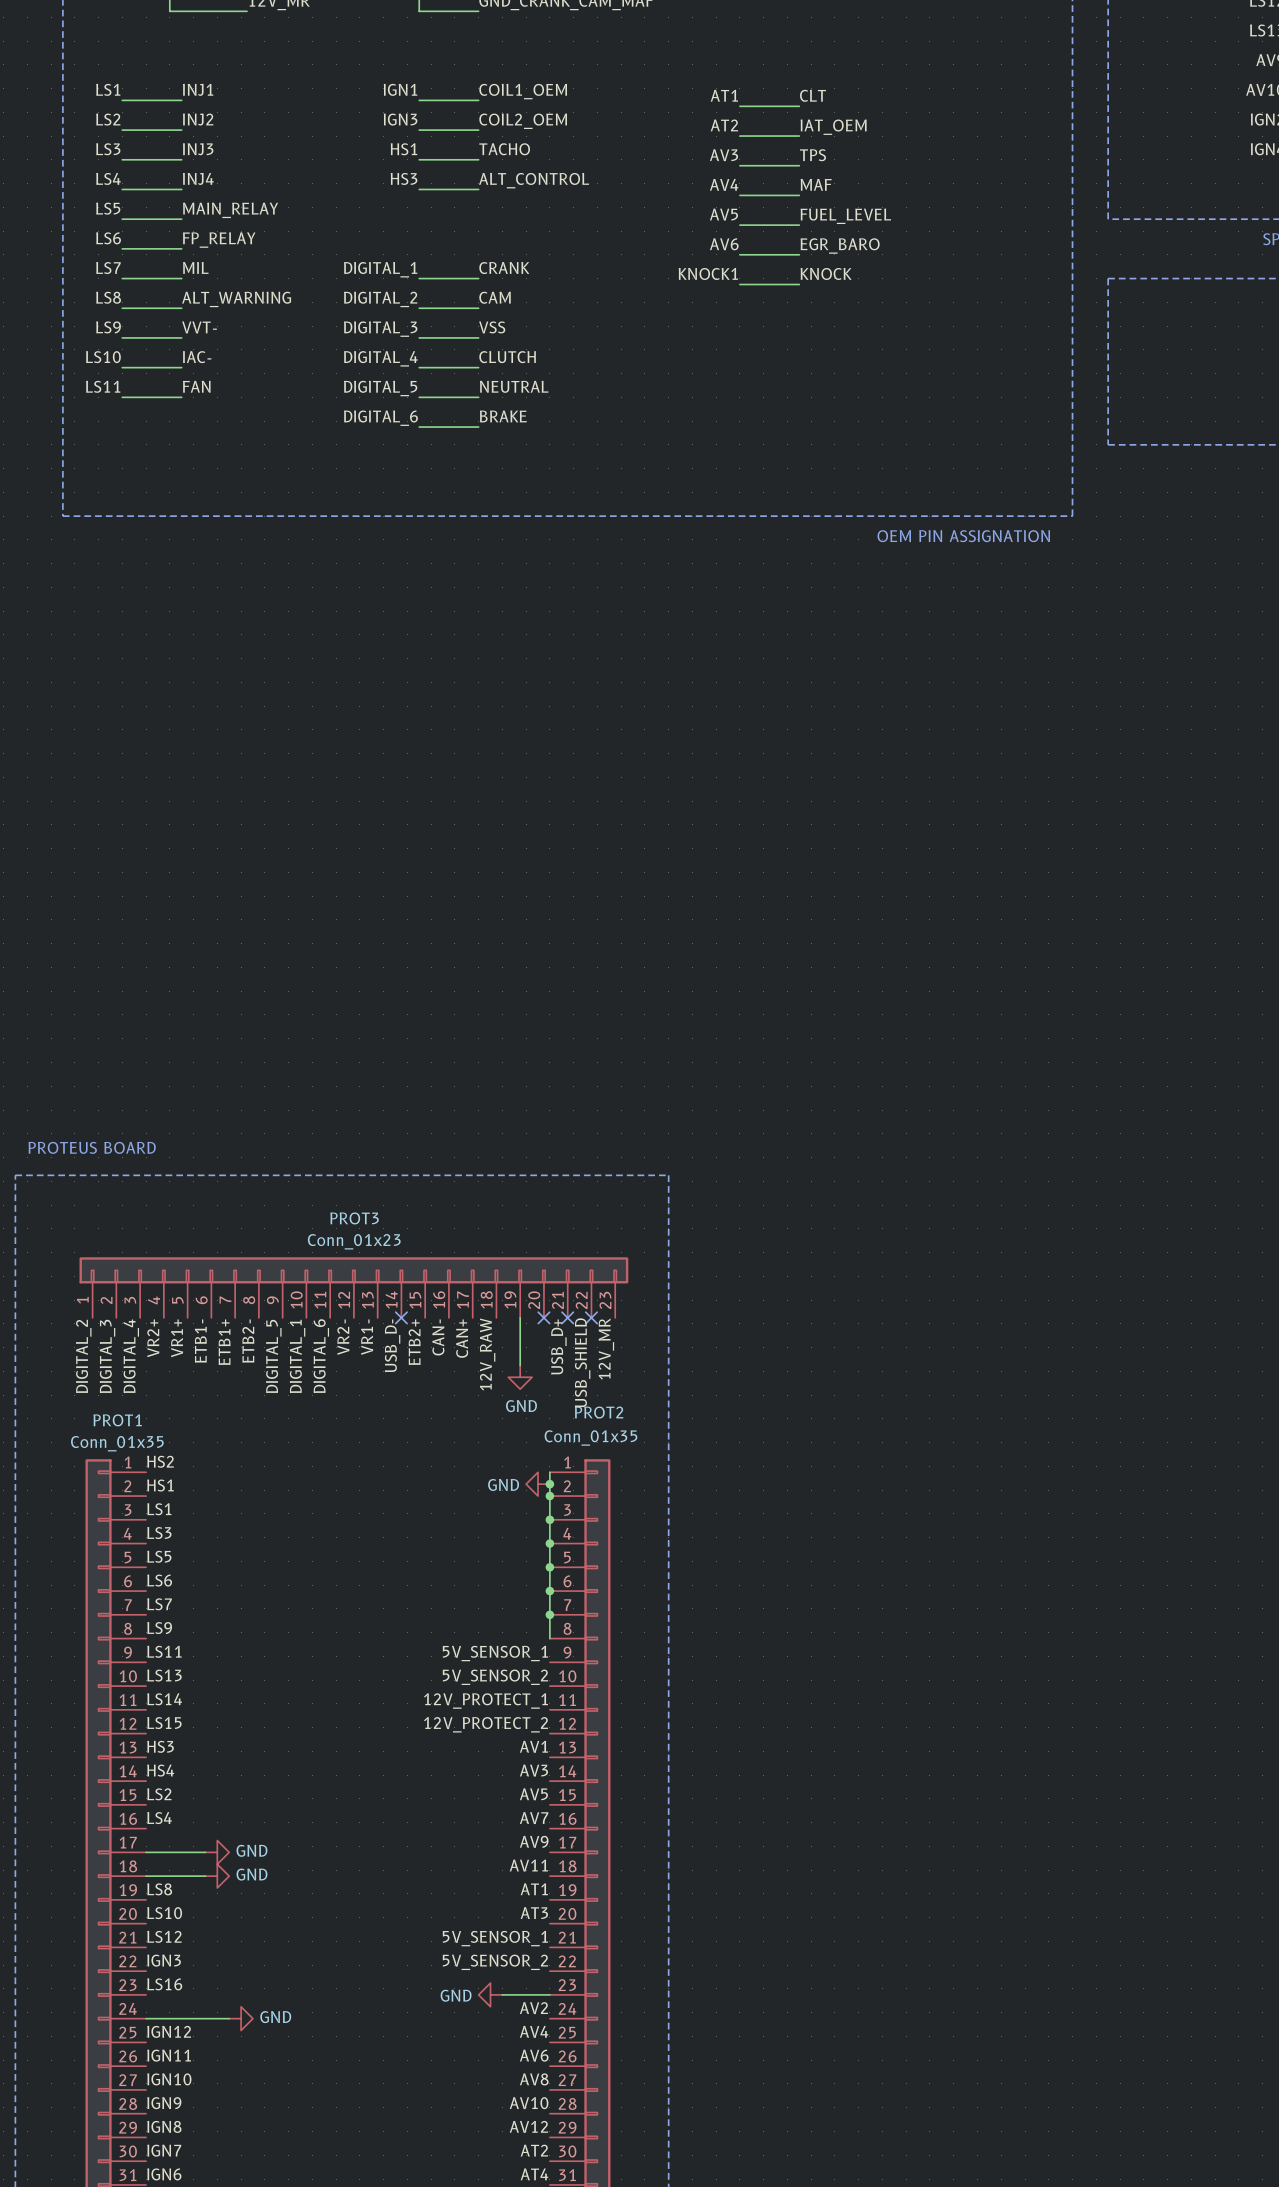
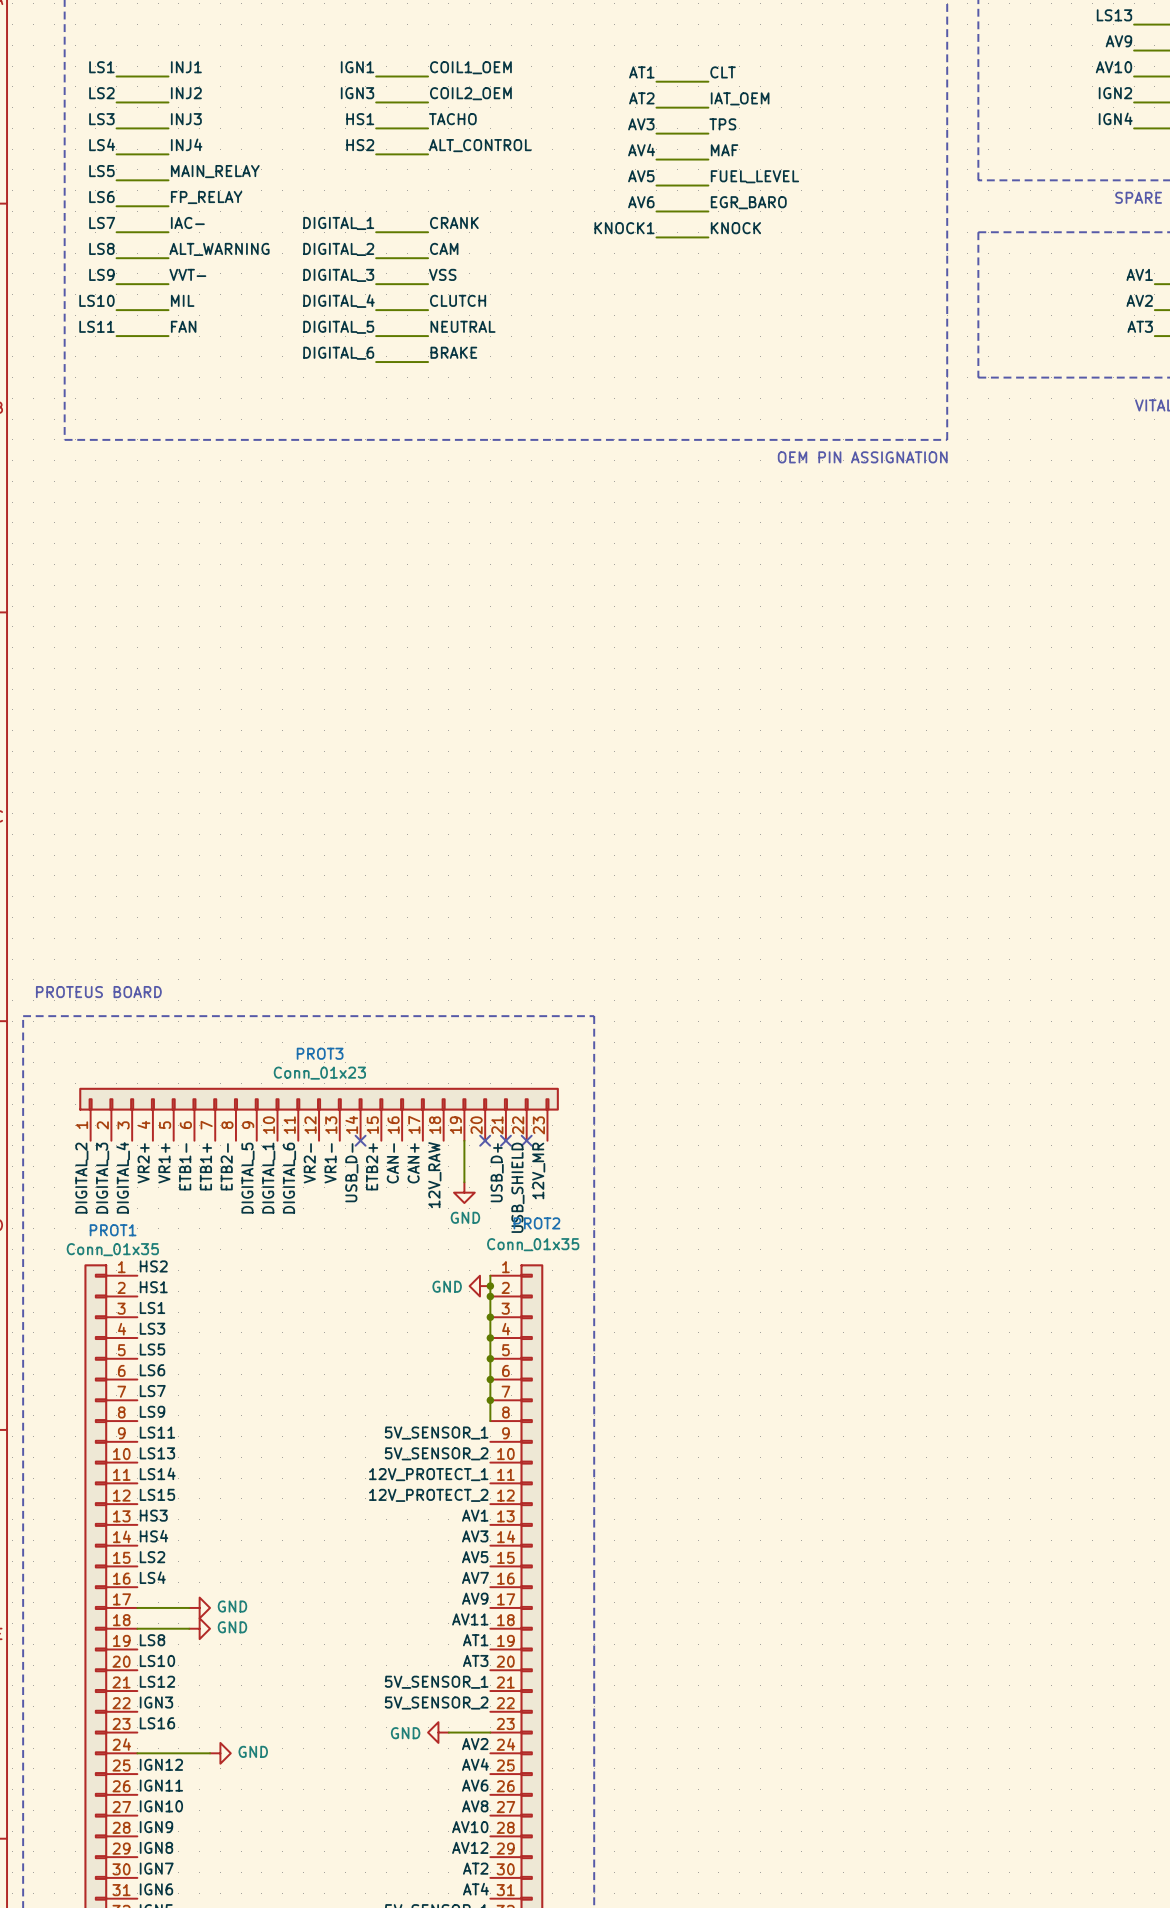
label: HS3 (404, 178) -> HS2 (360, 145)
label: MIL (195, 267) -> IAC- (187, 222)
label: IAC- (197, 357) -> MIL (182, 300)

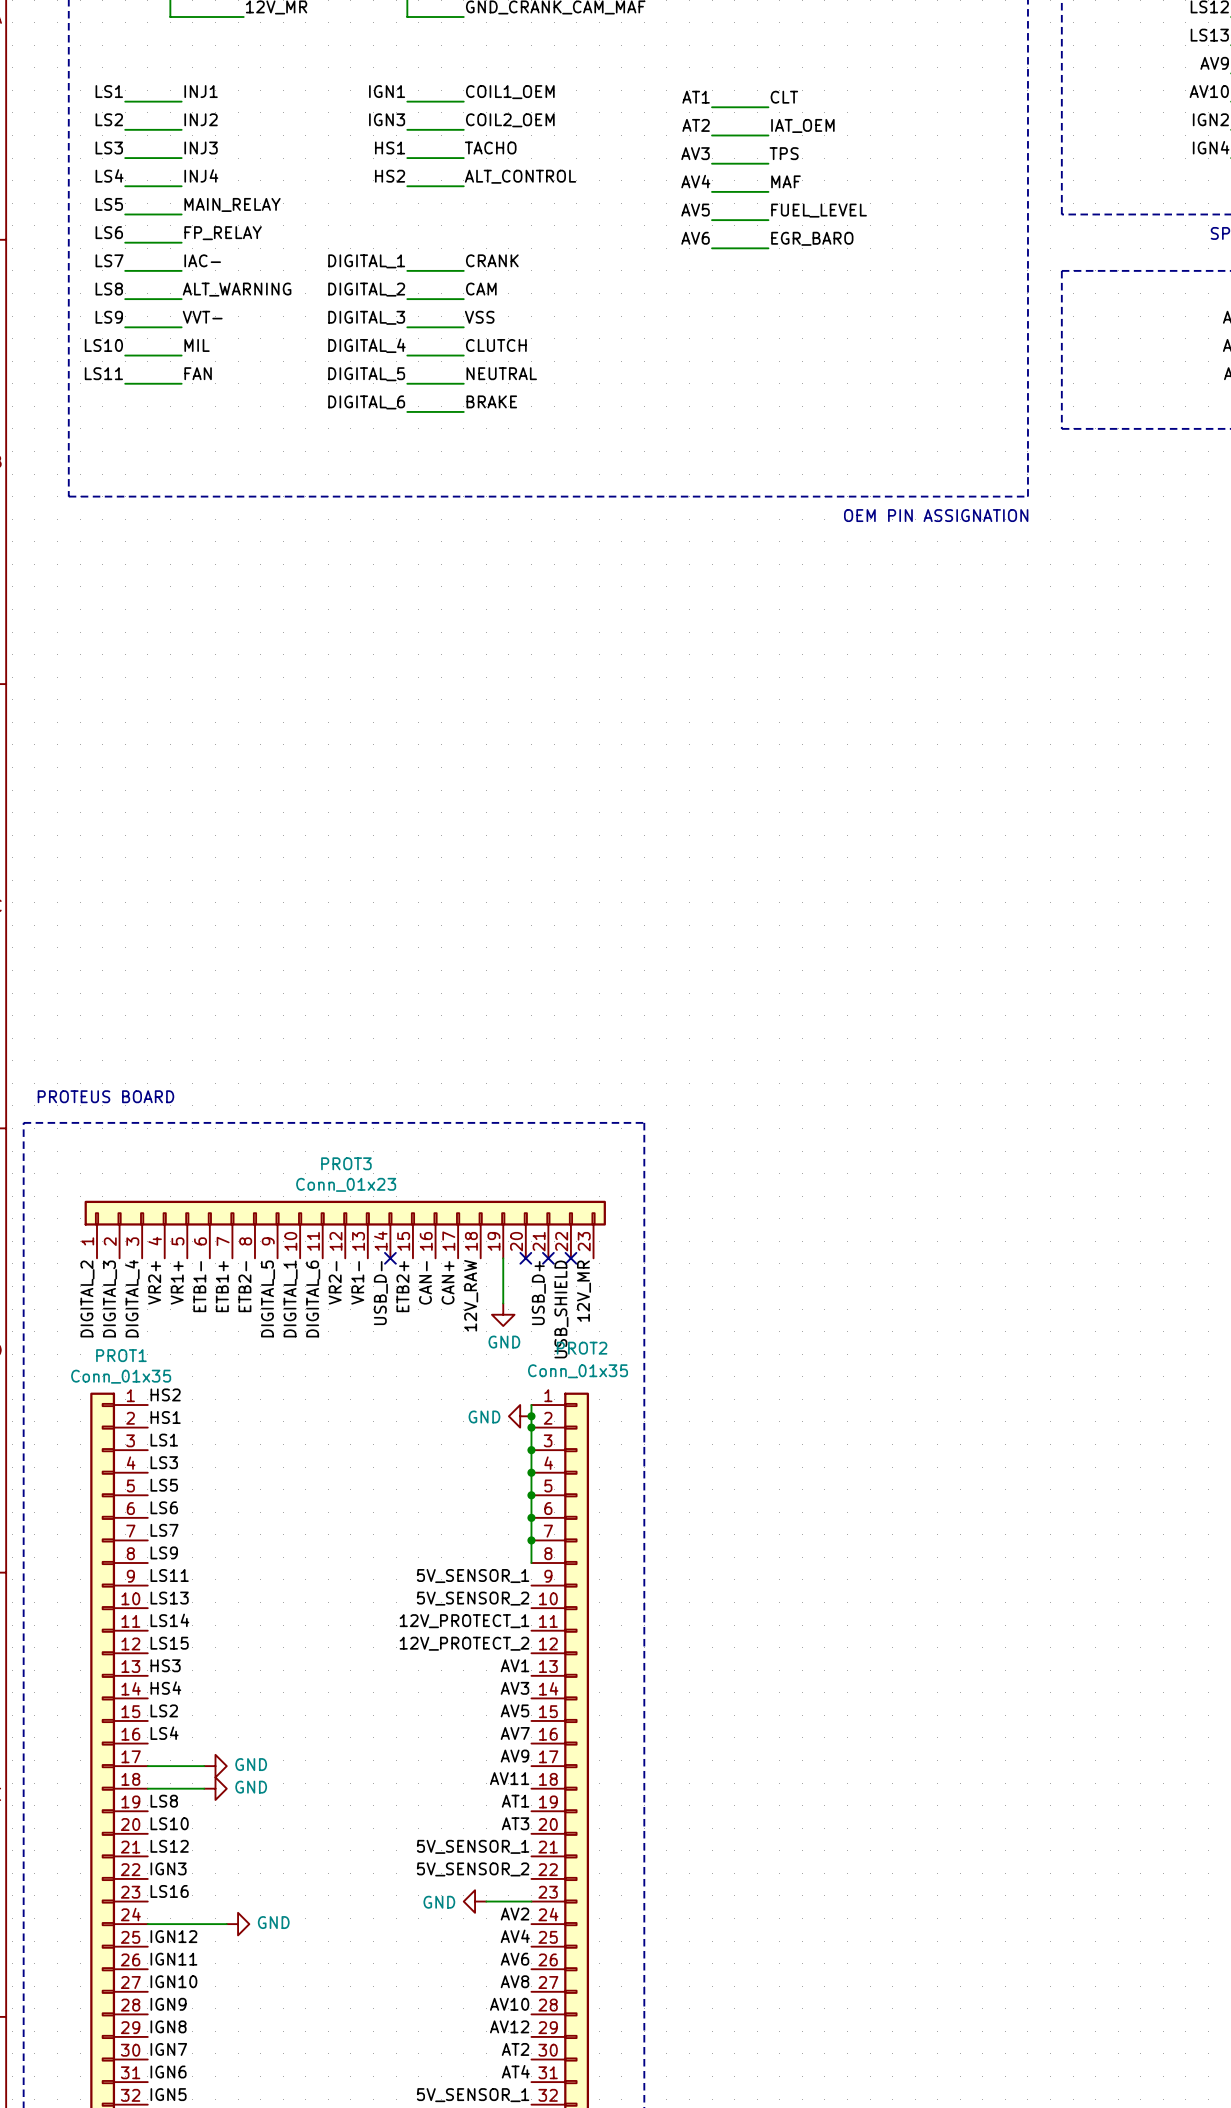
label: KNOCK1 (624, 228) -> none
label: KNOCK (735, 228) -> none
wire: (656, 237) (708, 237) -> none

